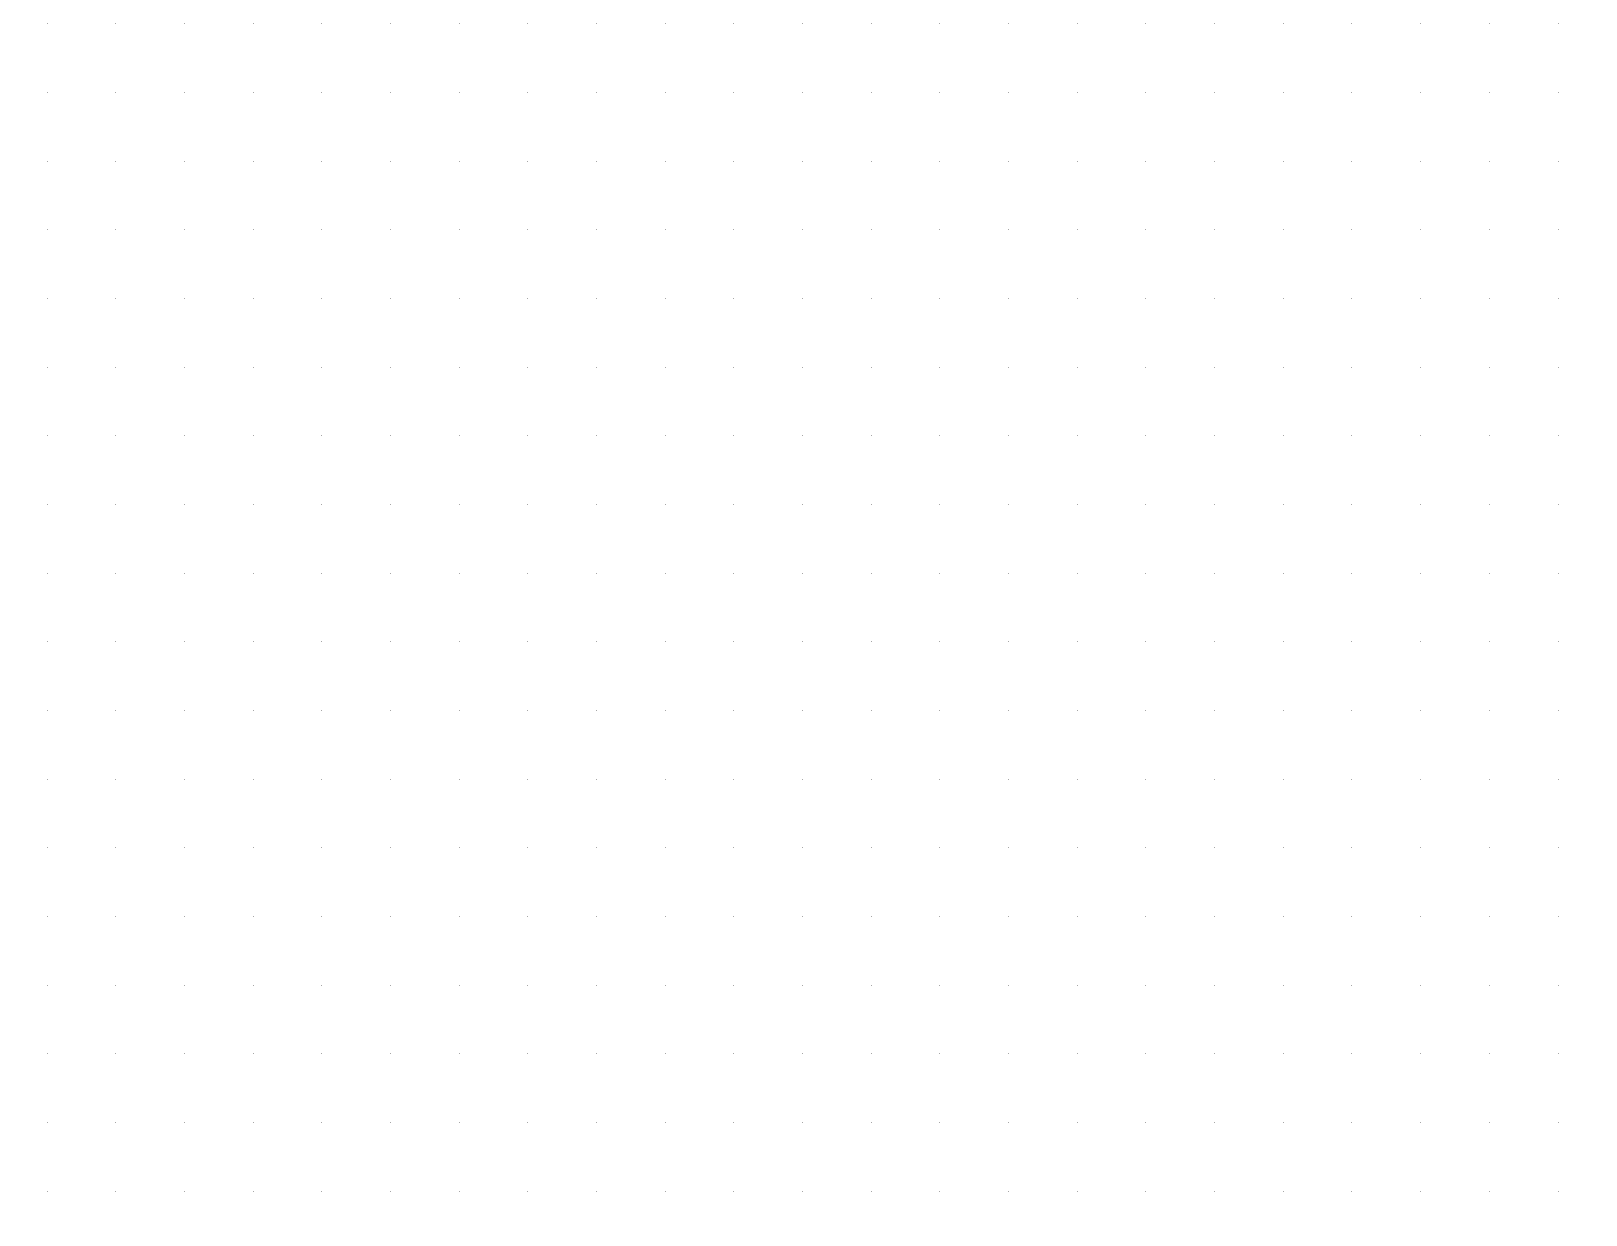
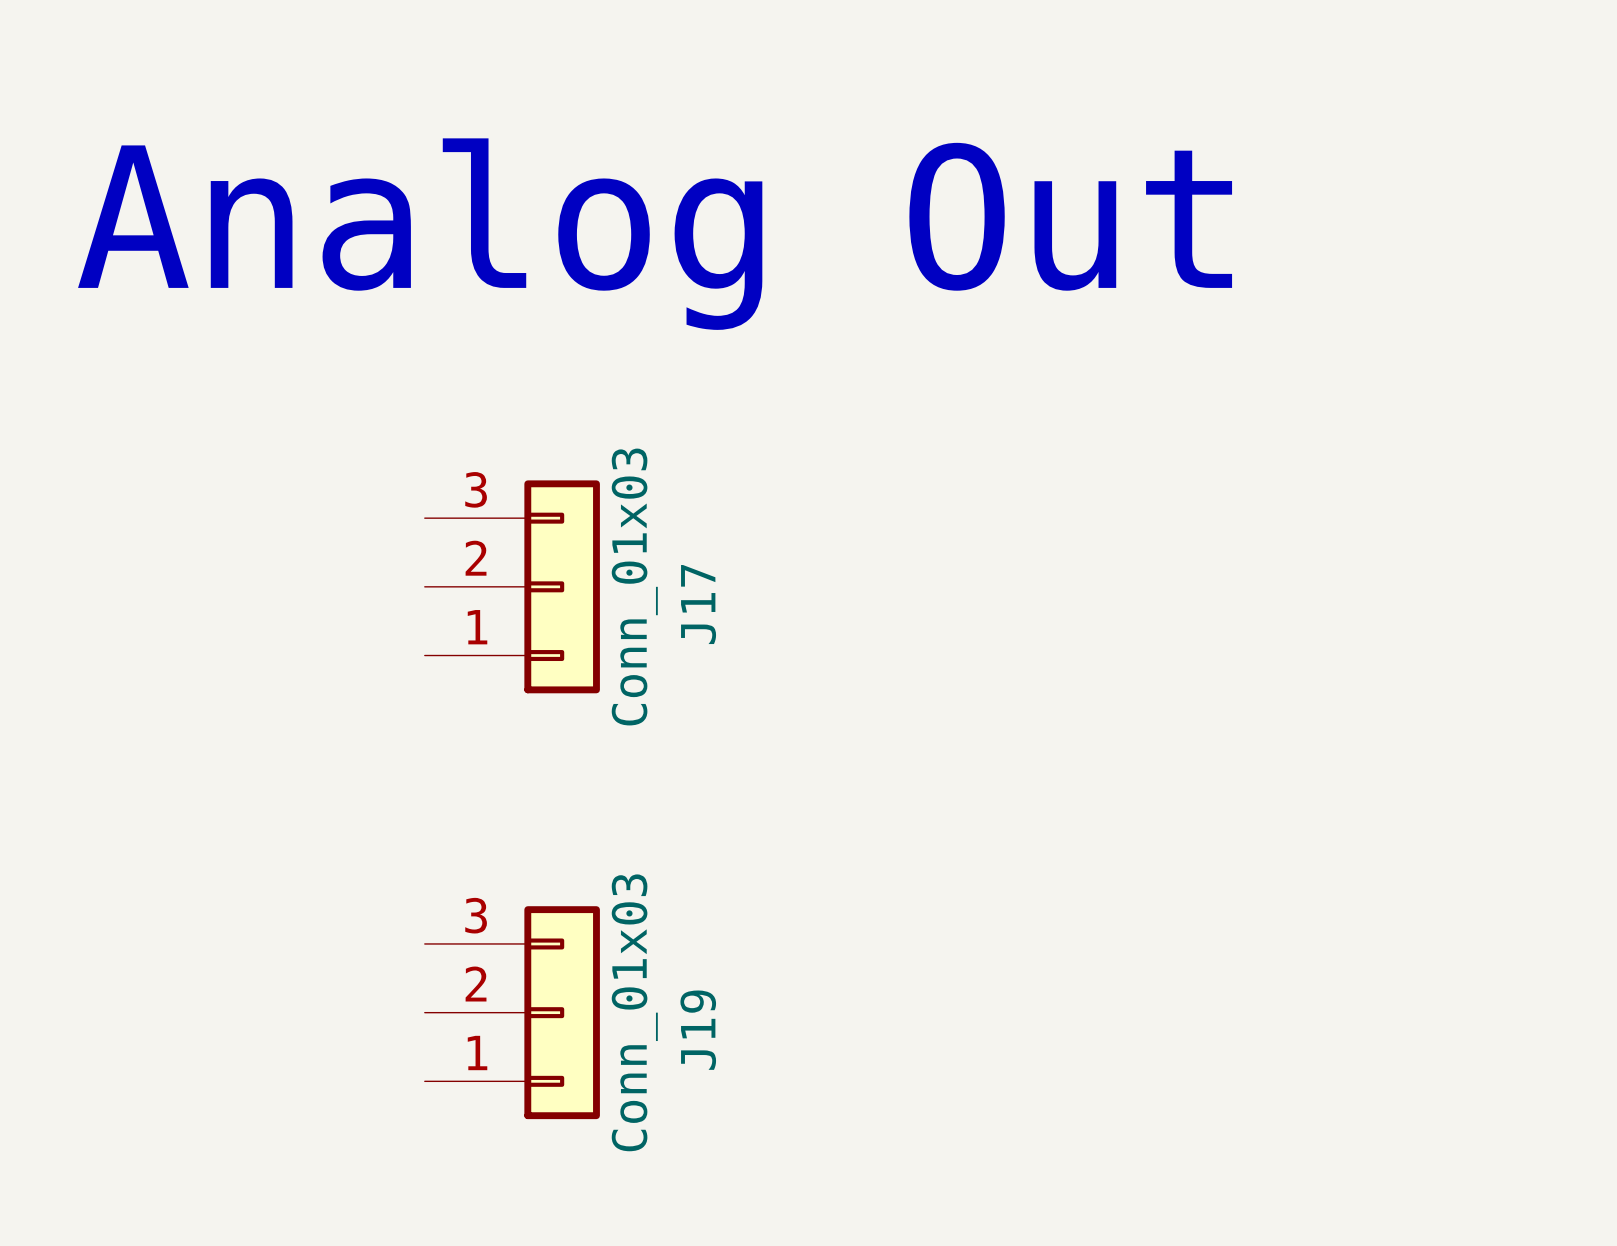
text: none -> Analog Out (655, 234)
J17: none -> Conn_01x03 (512, 586)
J19: none -> Conn_01x03 (512, 1012)

